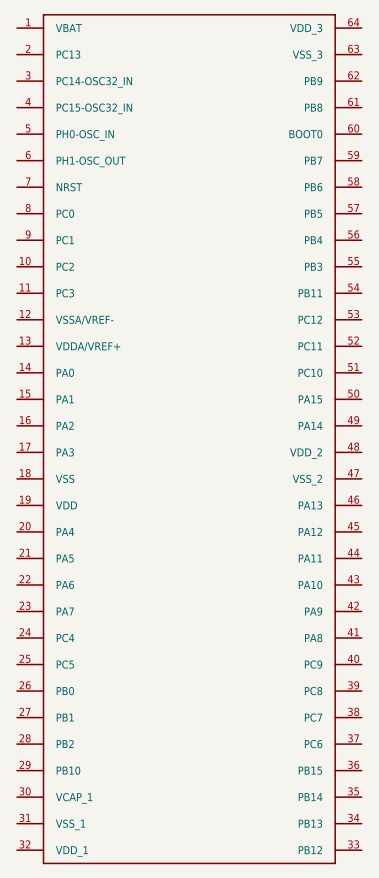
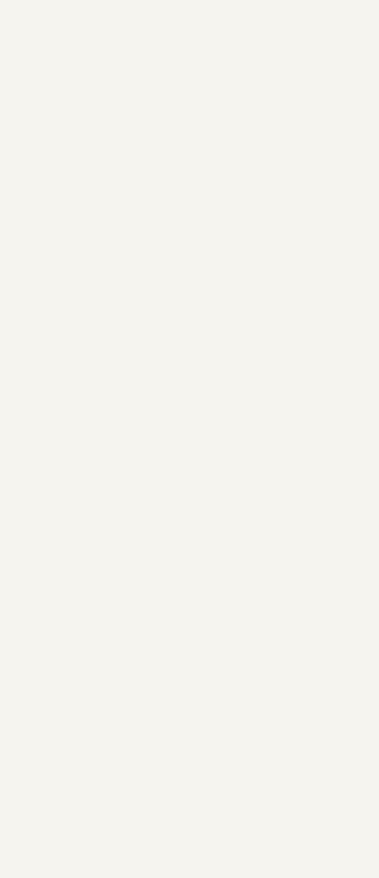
part: (189, 439) -> none

